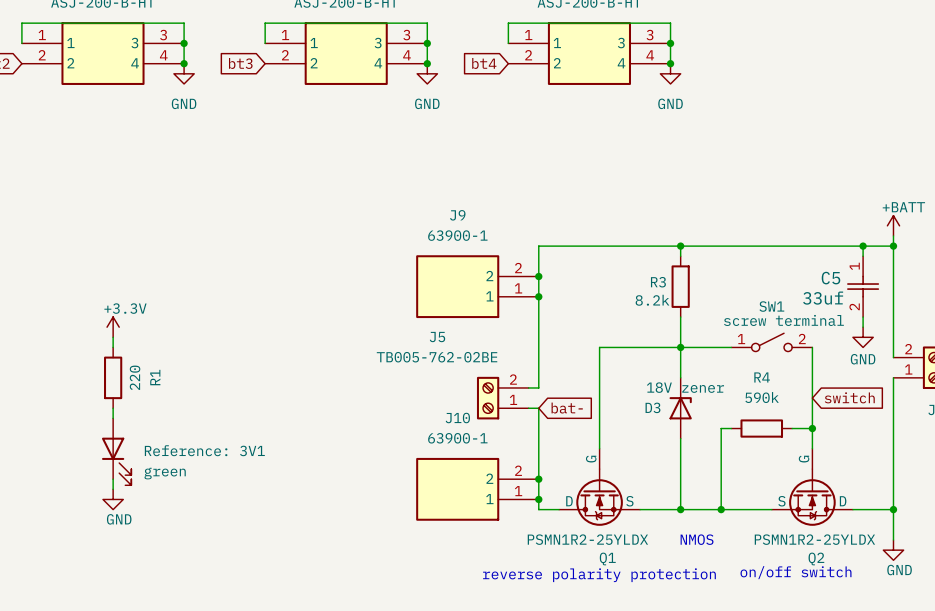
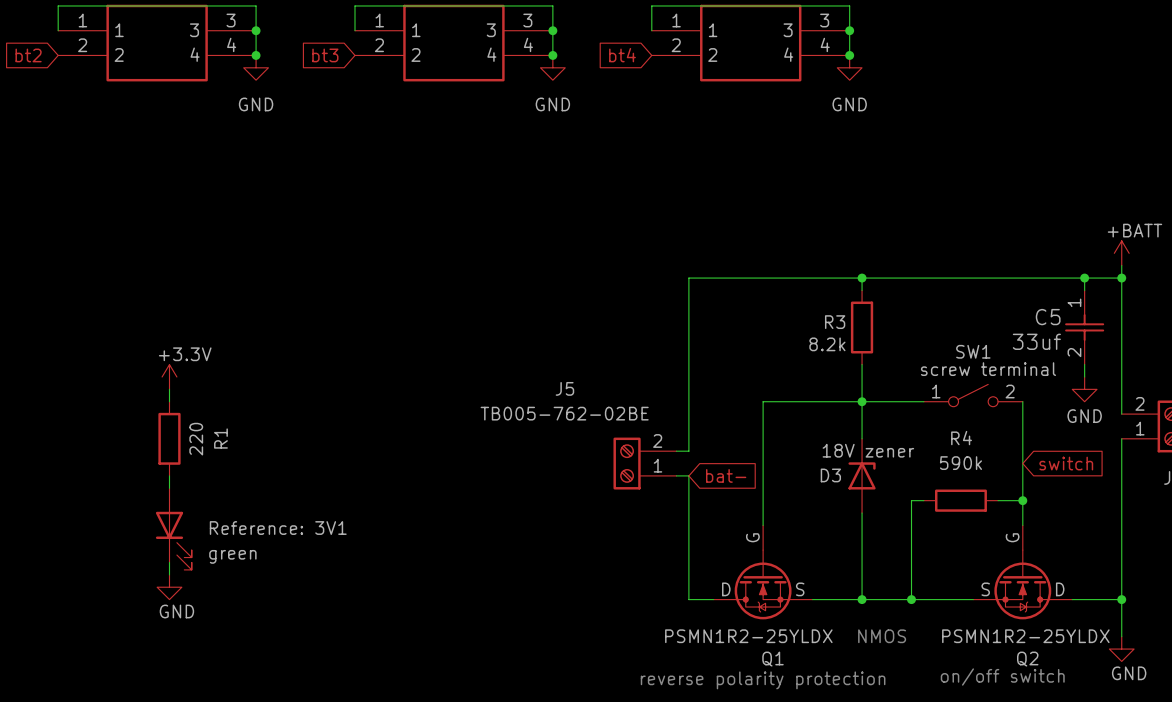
junction: (538, 276) -> none
J9: 63900-1 (477, 286) -> none
junction: (538, 296) -> none
junction: (538, 479) -> none
J10: 63900-1 (477, 489) -> none
junction: (538, 499) -> none

